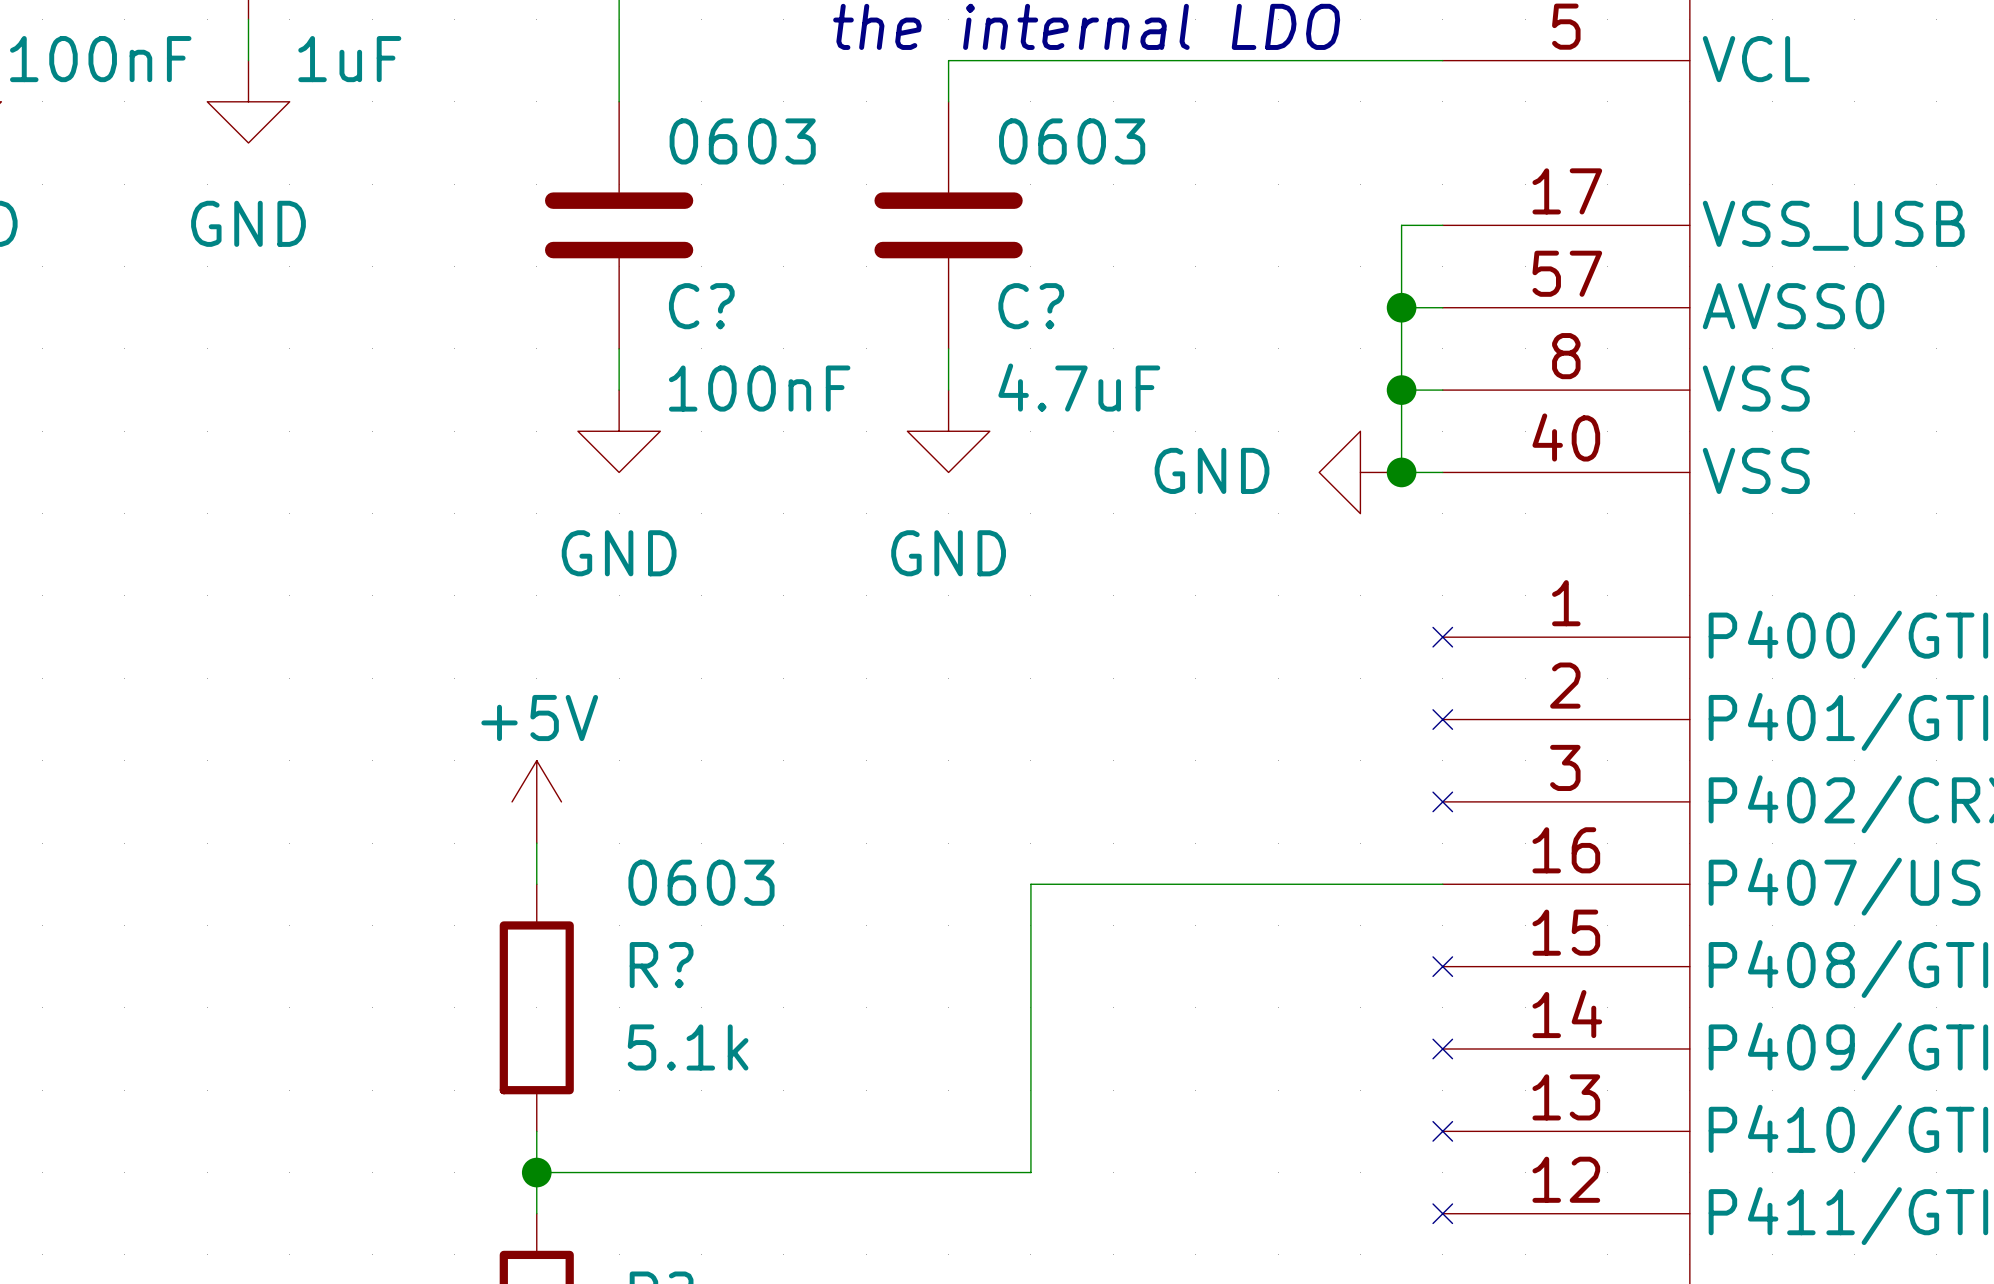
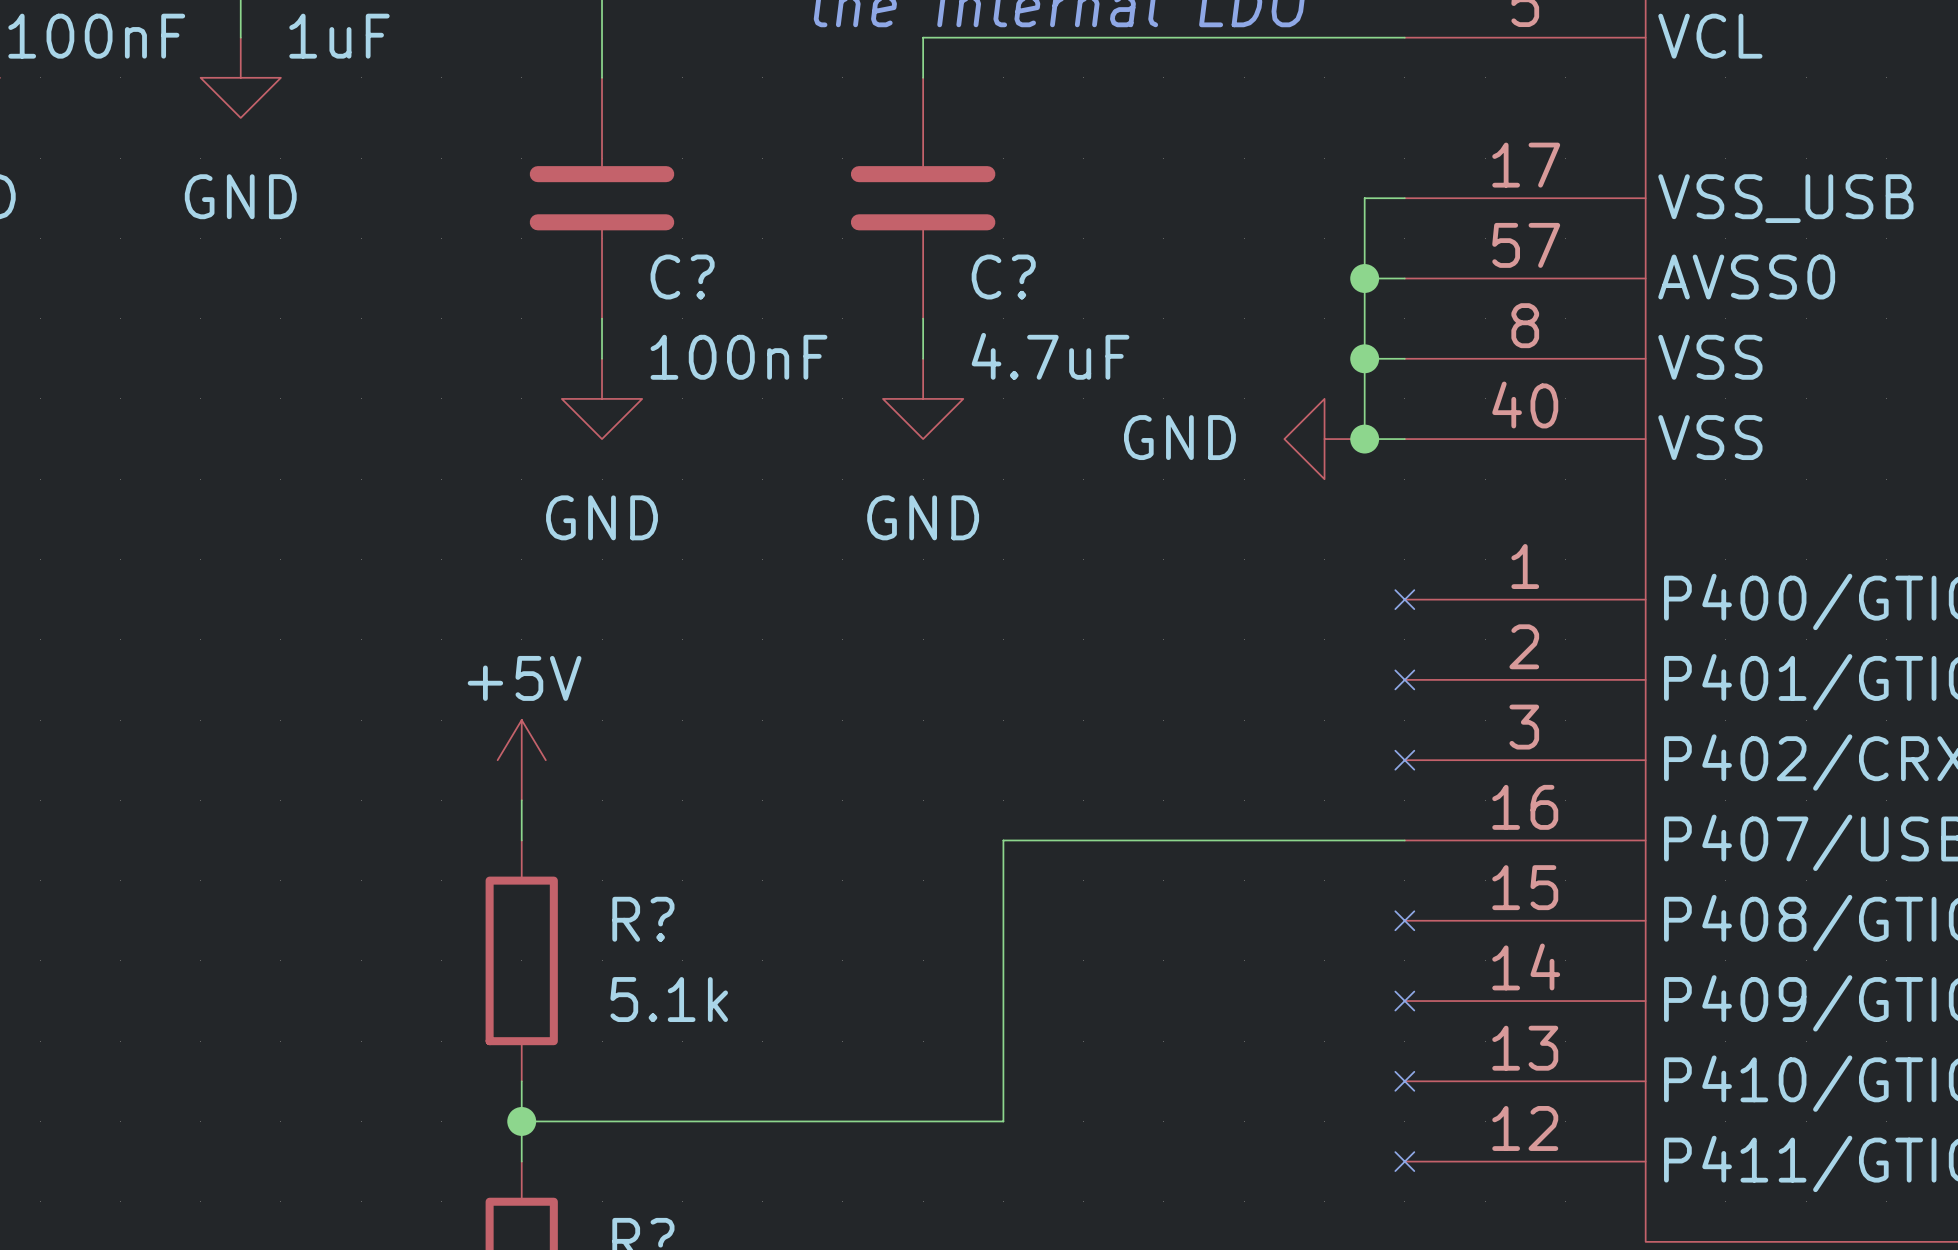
C? text: 0603 (742, 141) -> none
C? text: 0603 (1072, 141) -> none
R? text: 0603 (701, 882) -> none

